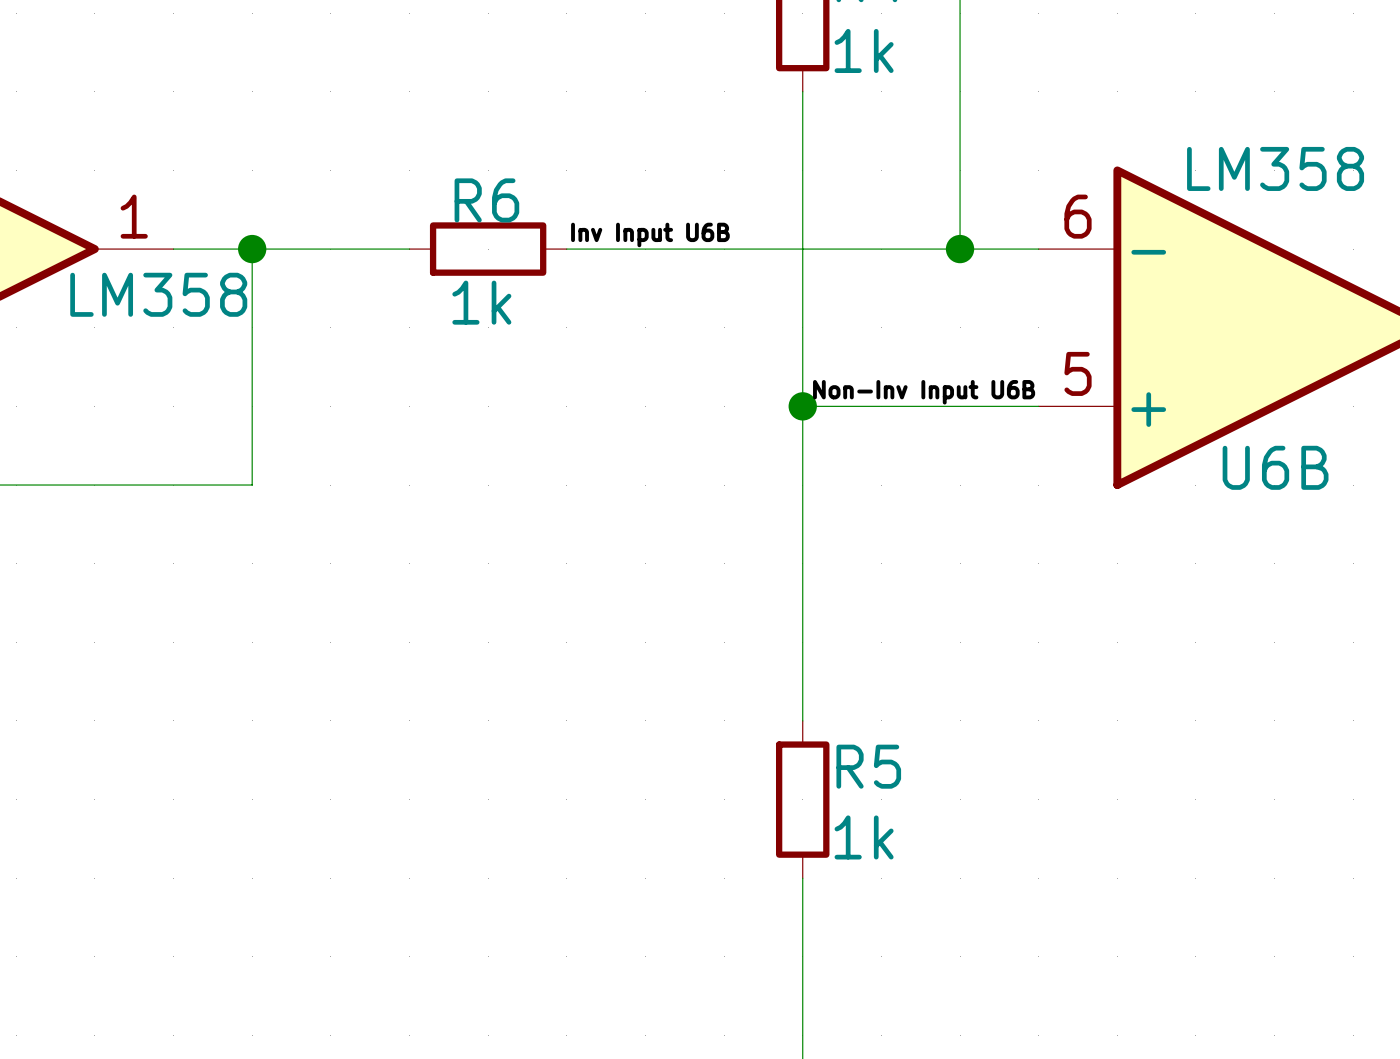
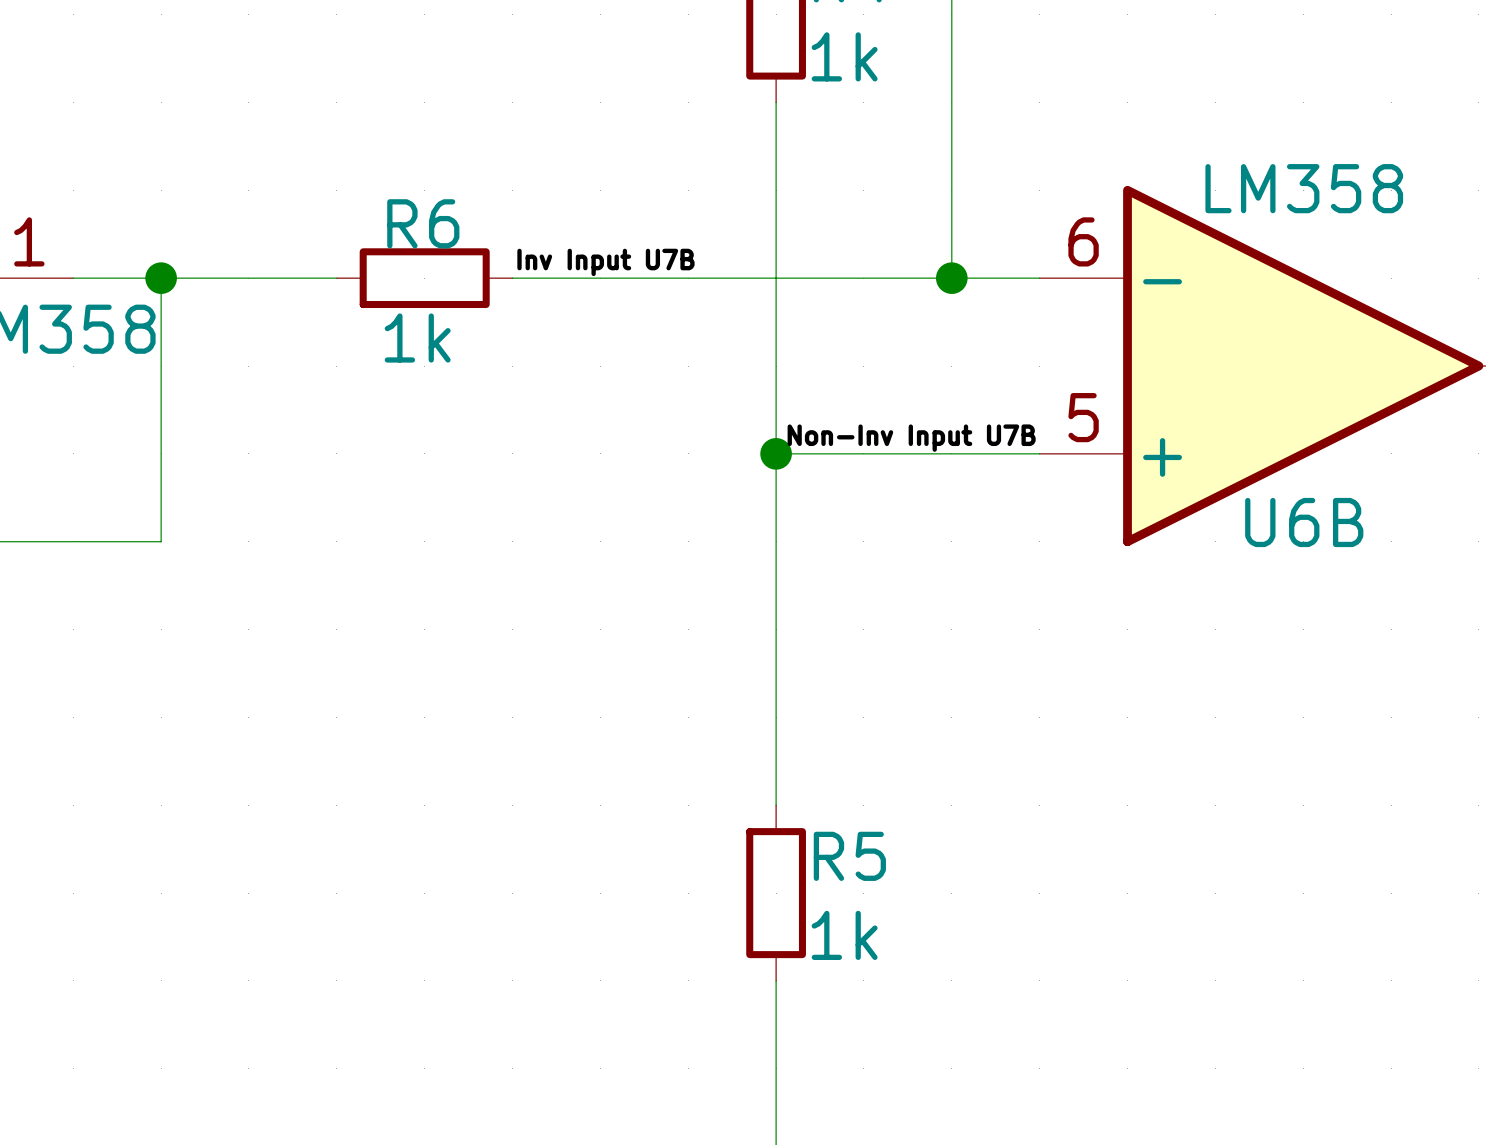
label: Inv Input U6B (650, 234) -> Inv Input U7B (605, 262)
label: Non-Inv Input U6B (924, 392) -> Non-Inv Input U7B (911, 438)

